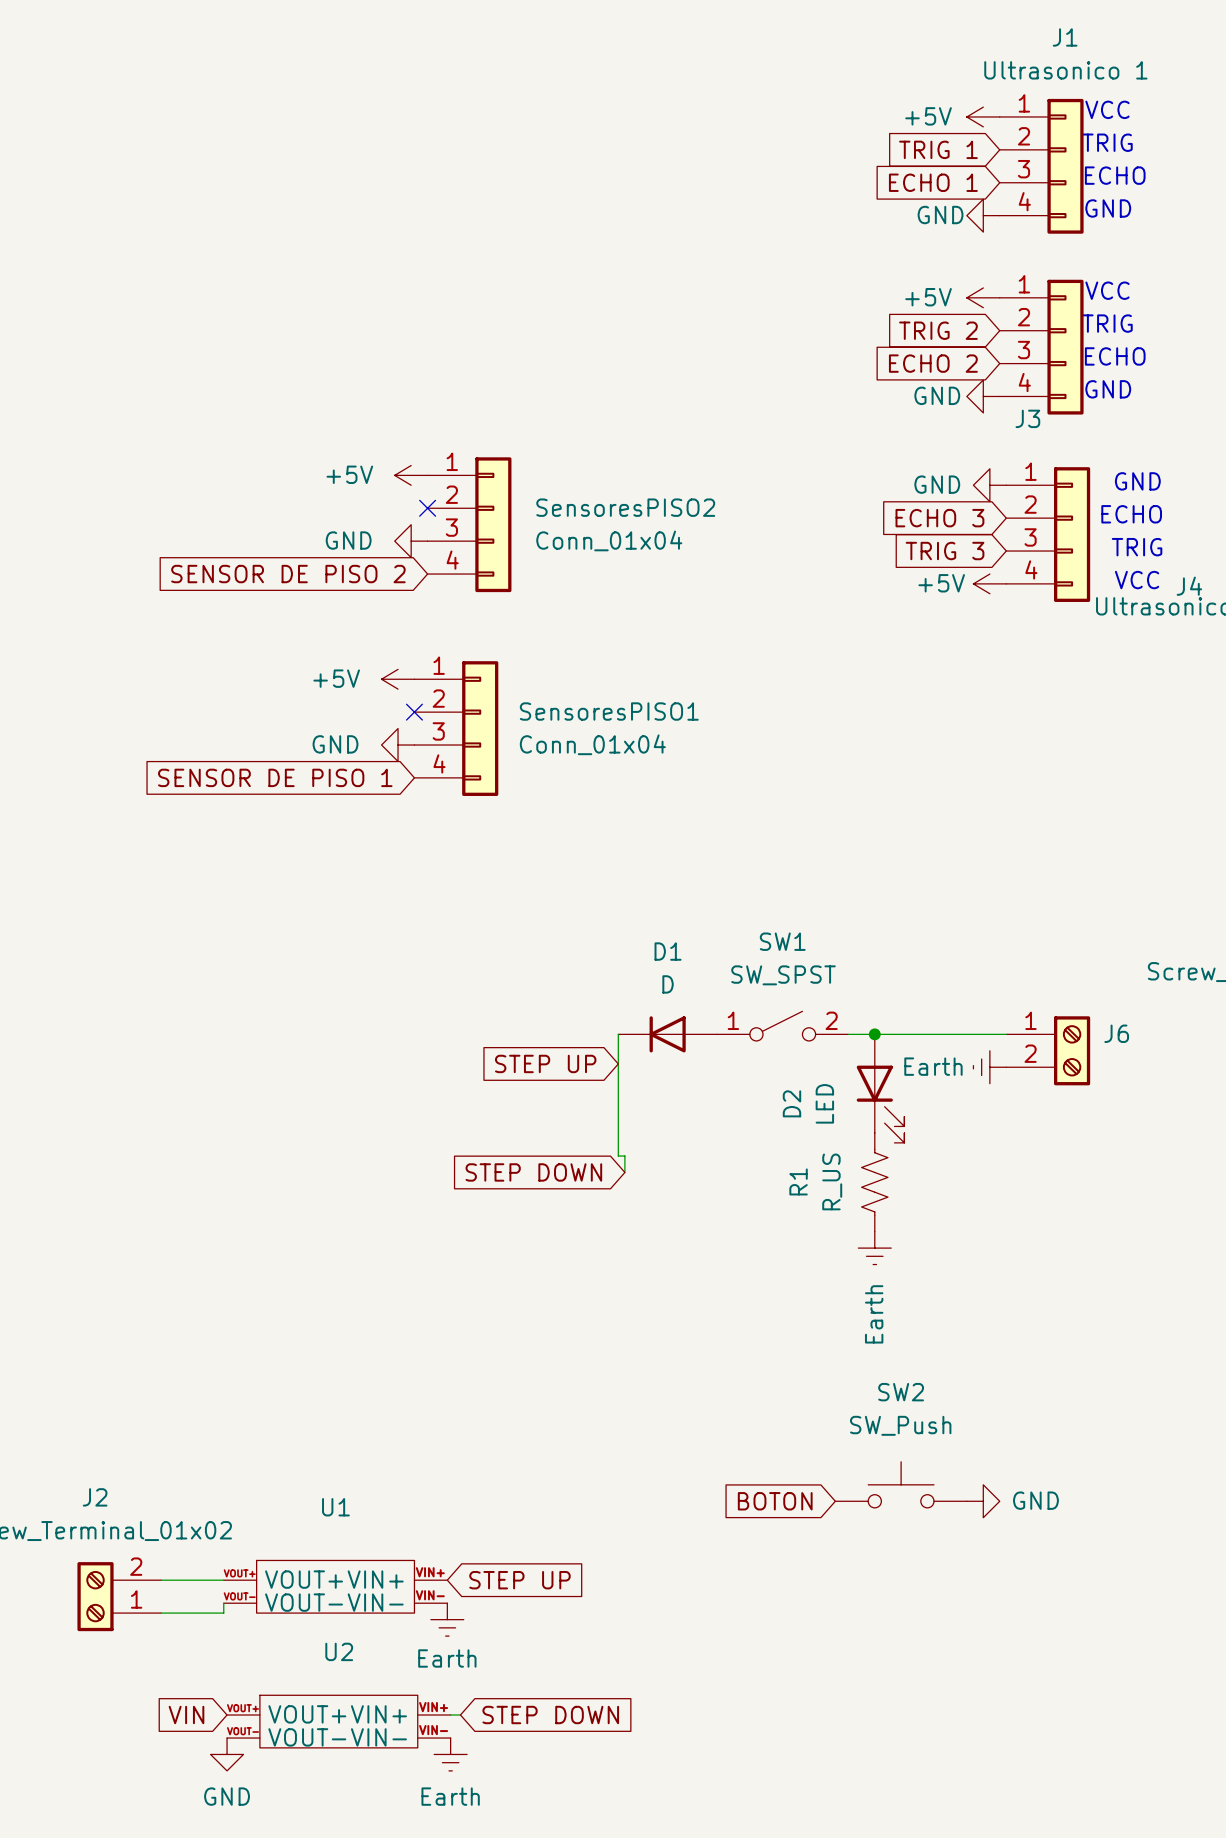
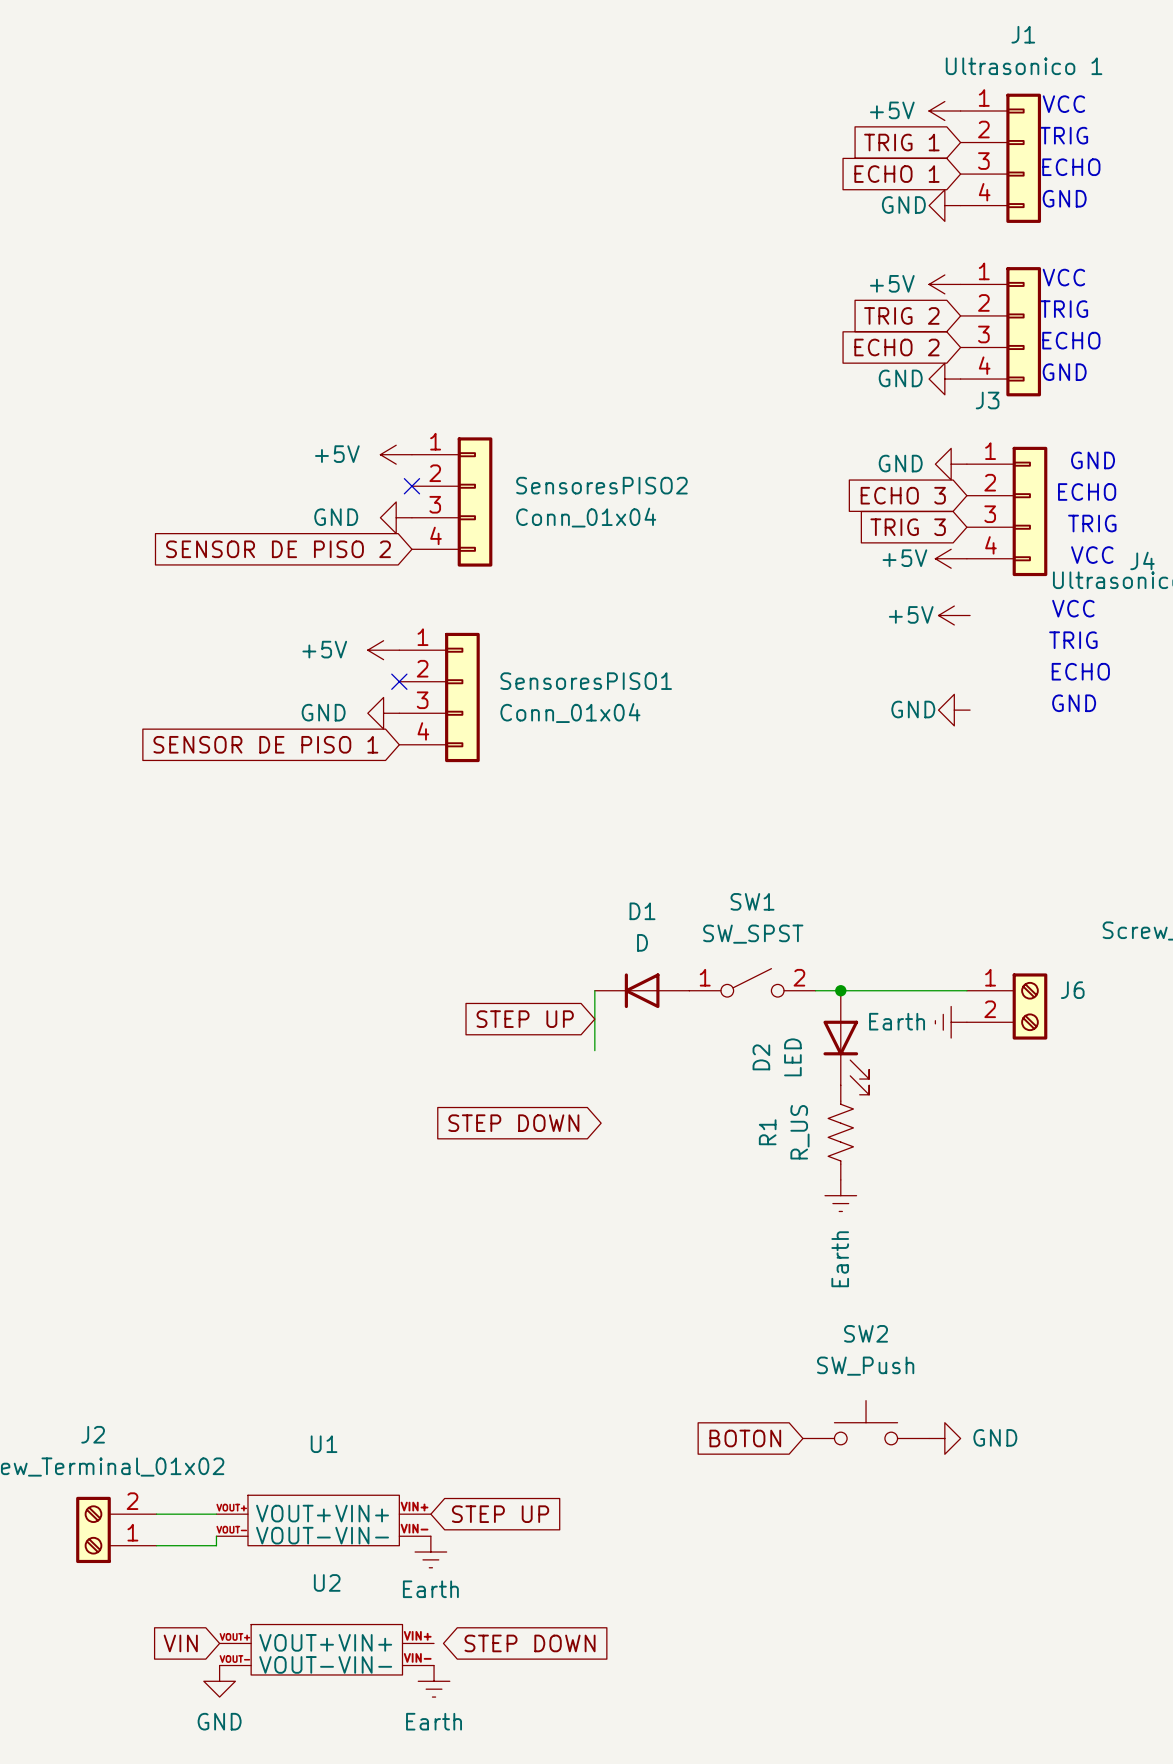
text: none -> VCC (1073, 608)
power symbol: none -> +5V (954, 615)
text: none -> TRIG (1073, 640)
text: none -> ECHO (1080, 671)
text: none -> GND (1074, 703)
power symbol: none -> GND (954, 710)
wire: (618, 1096) (618, 1156) (624, 1156) (624, 1172) -> none
wire: (450, 1715) (460, 1715) -> none

